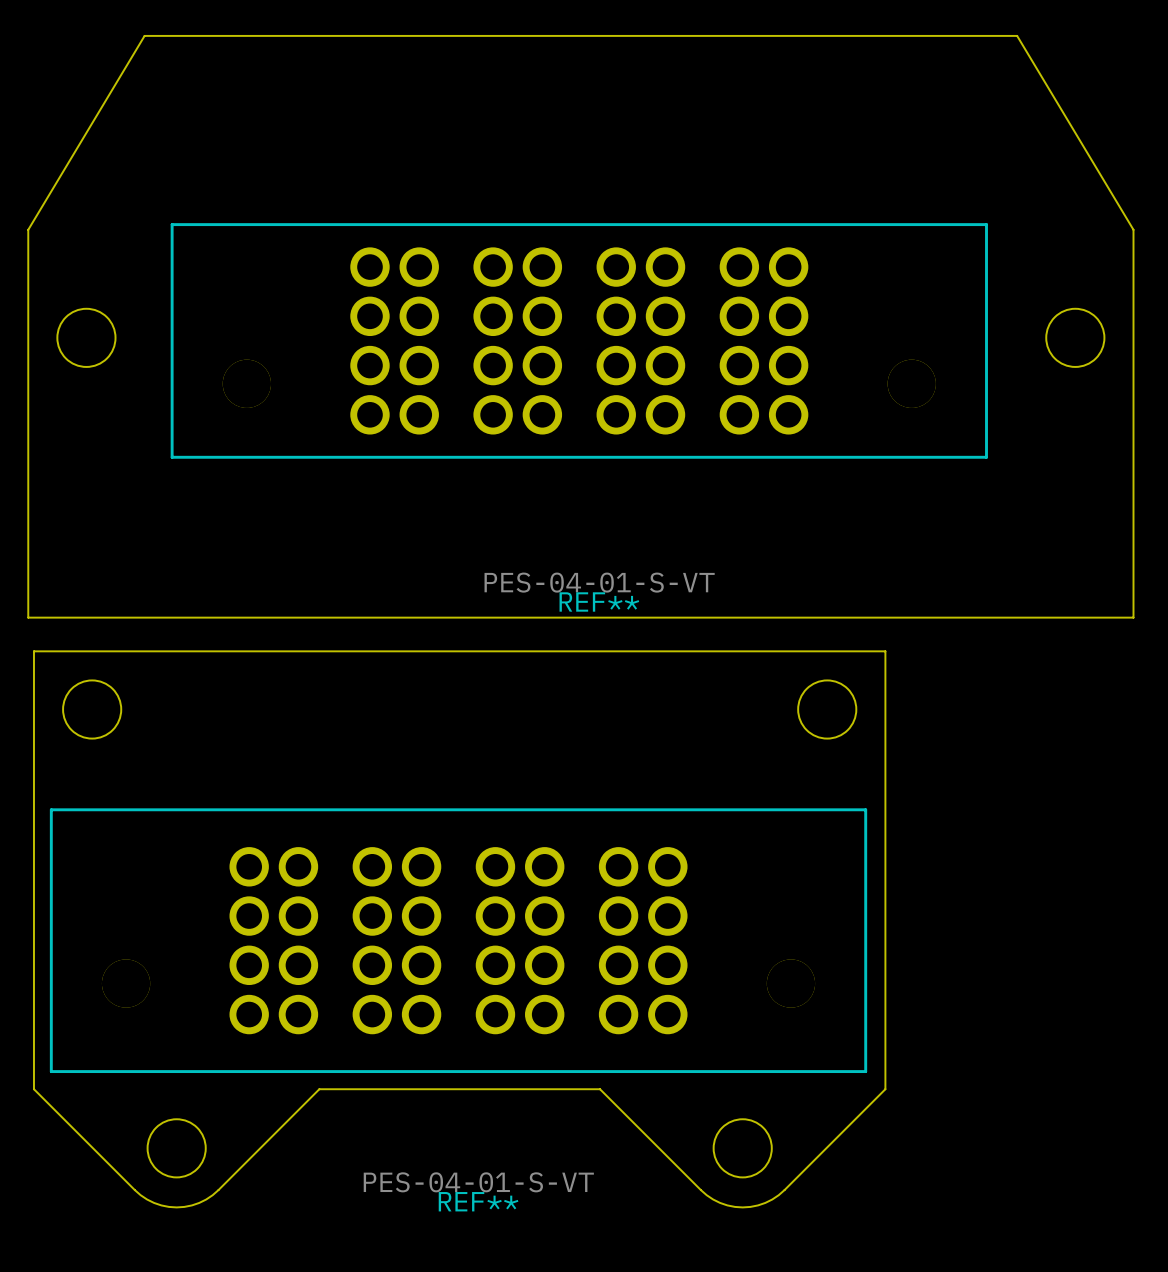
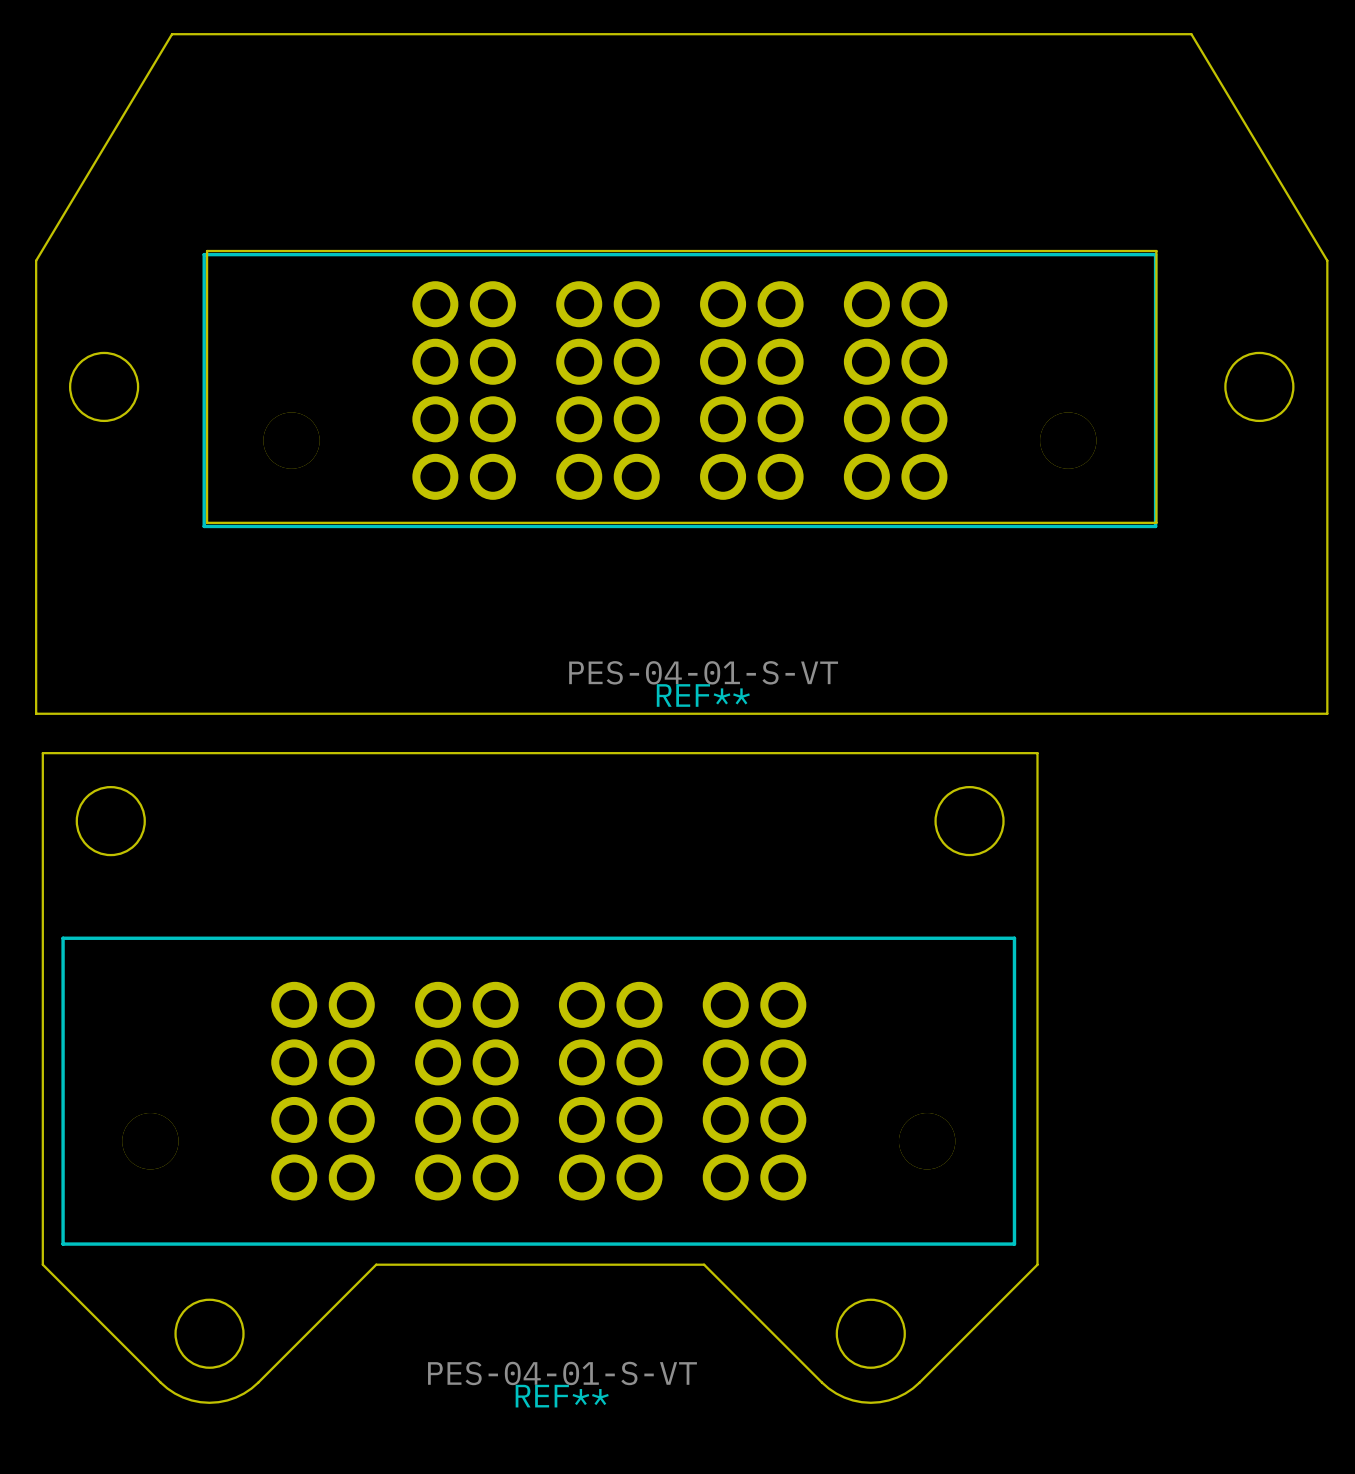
board edge: none -> (207, 251) (1156, 251) (1156, 522) (207, 522) (207, 251)

